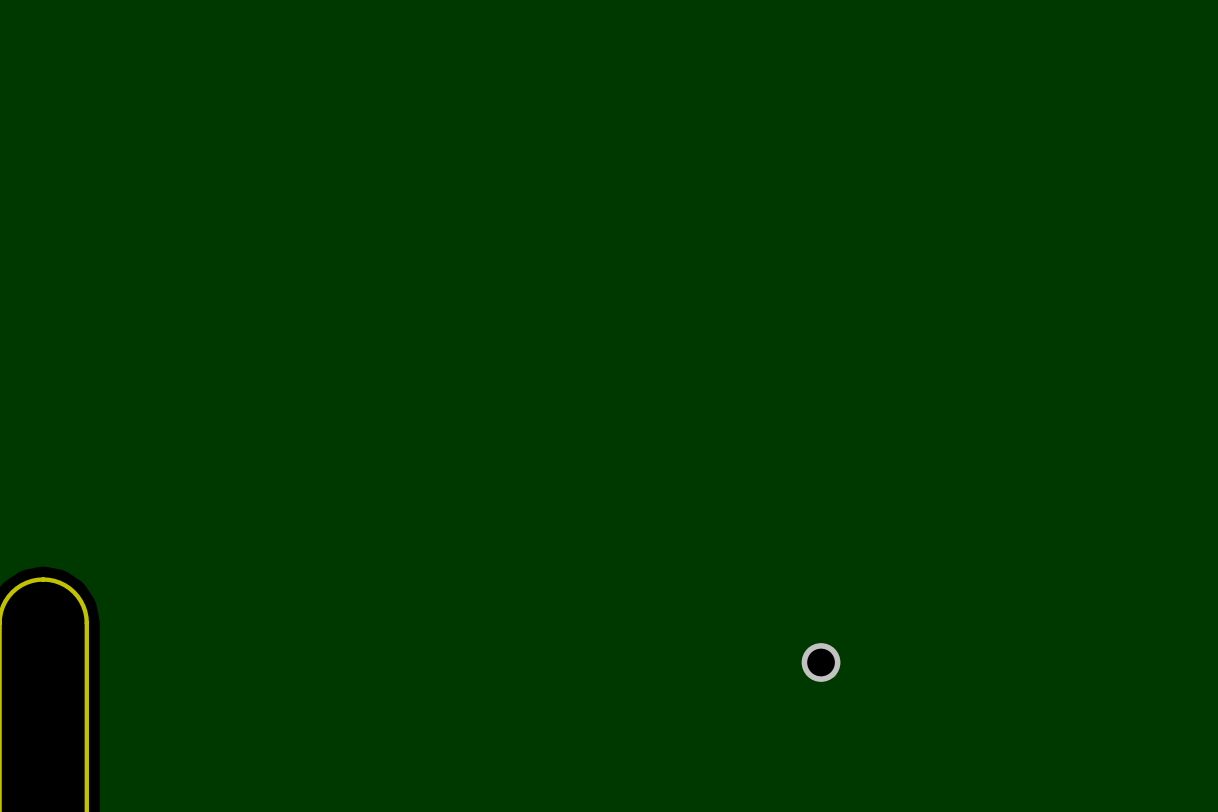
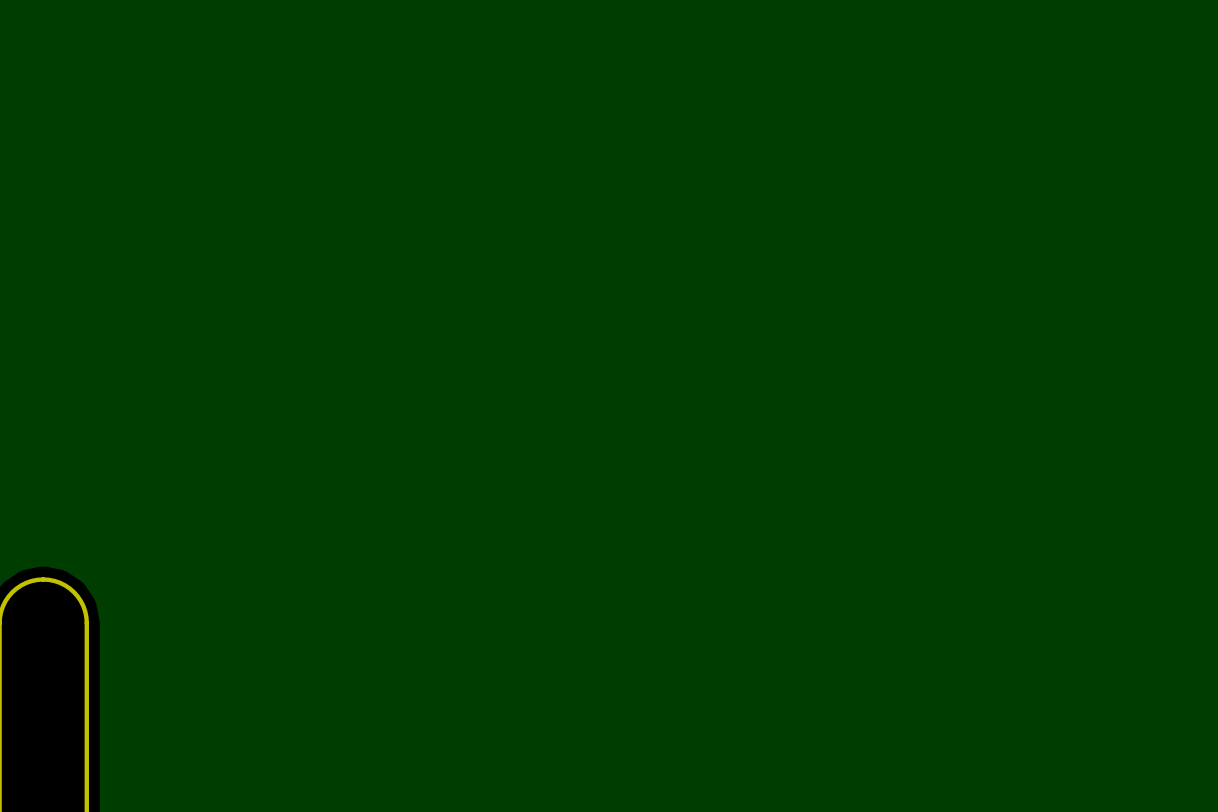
via: (821, 662) -> none

